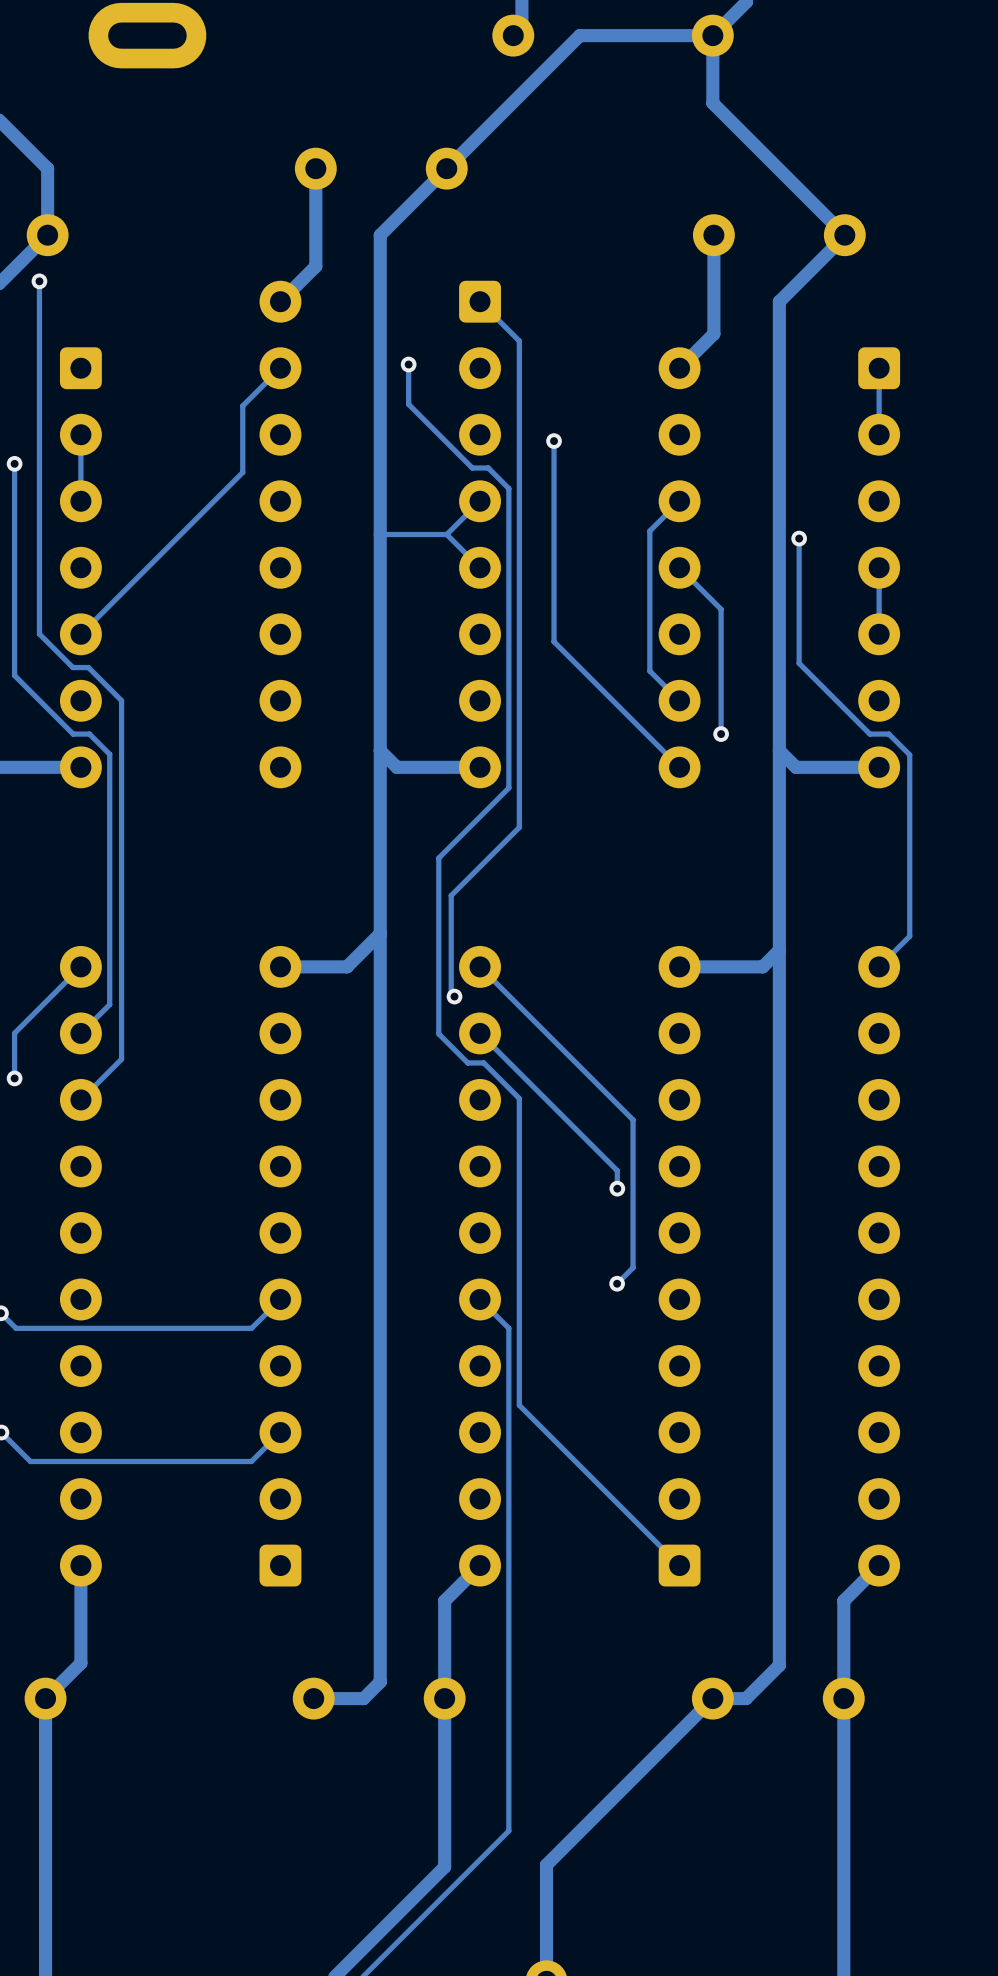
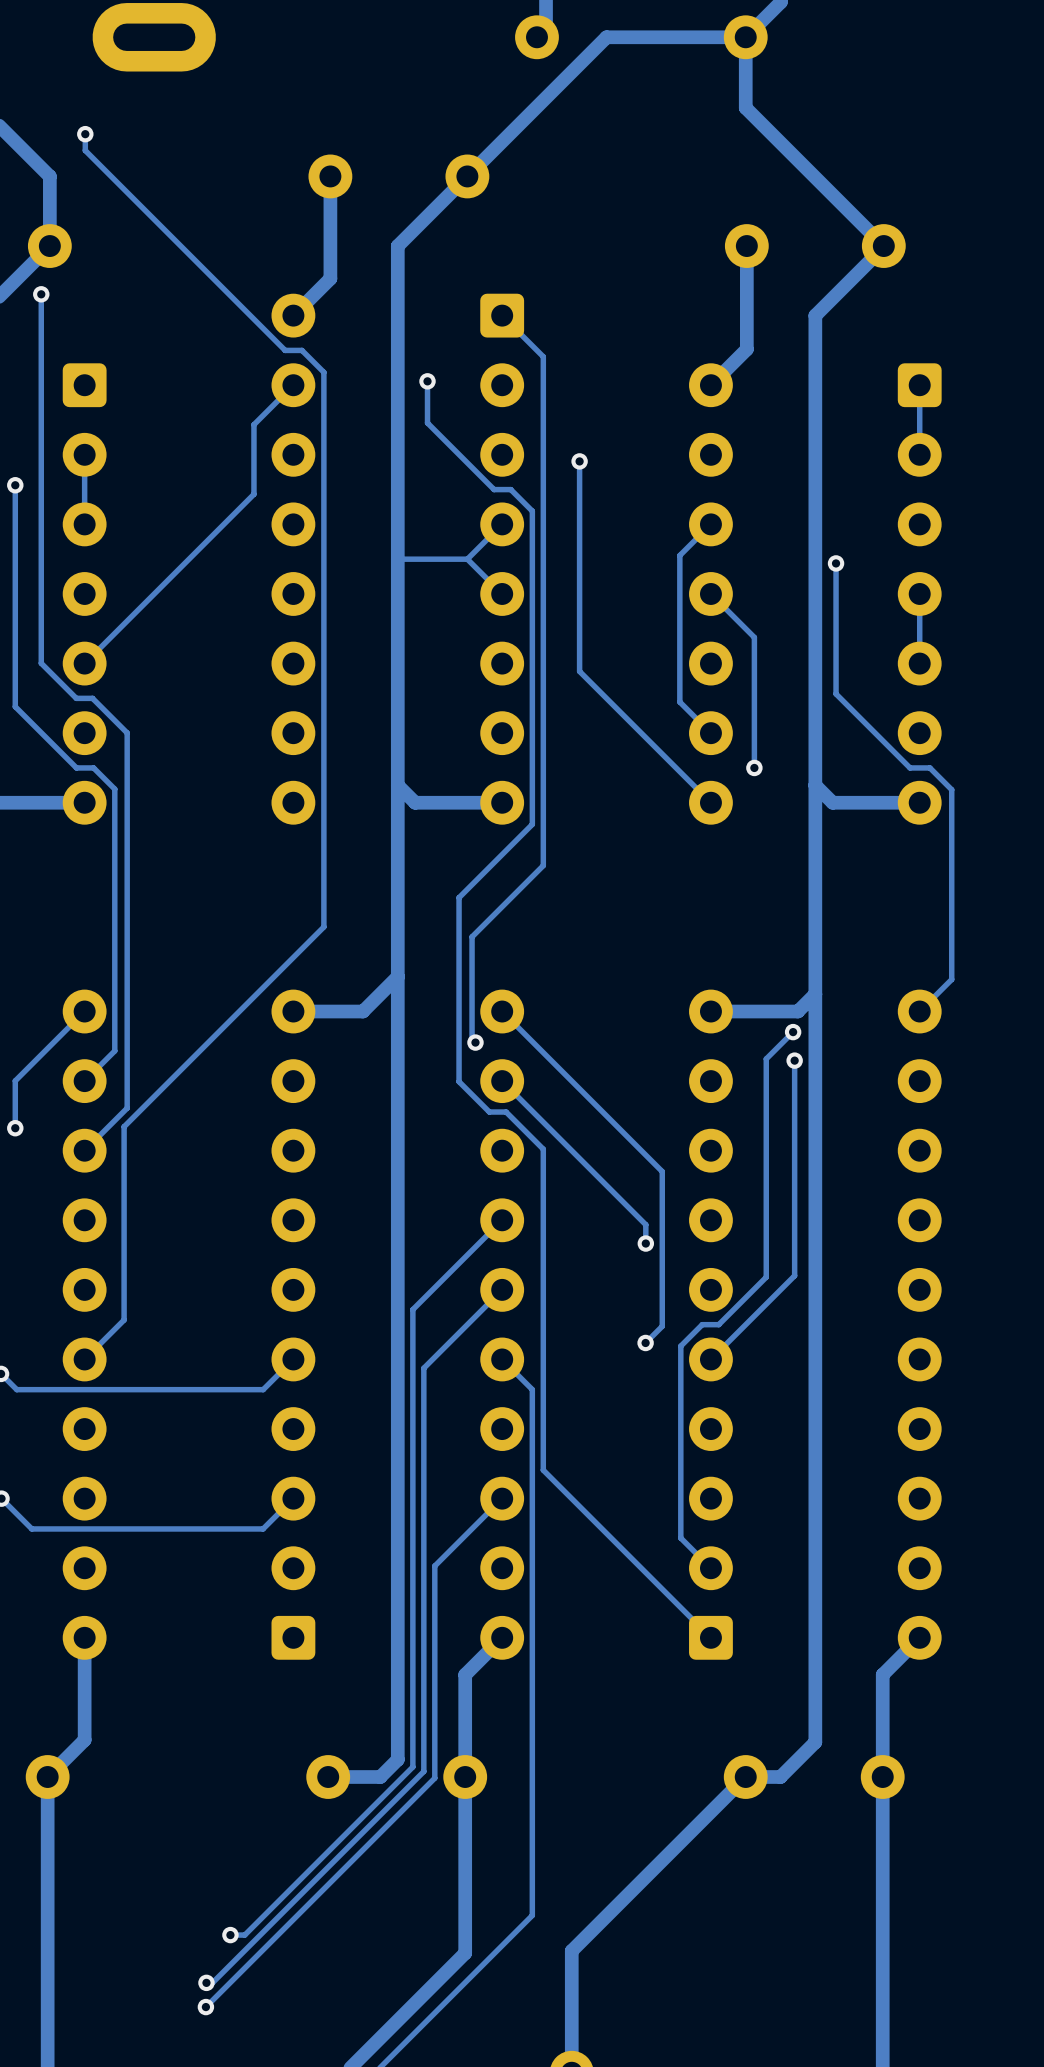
track: none -> (85, 134) (85, 150) (285, 350) (301, 350) (323, 372) (323, 926) (124, 1126) (124, 1320) (84, 1359)
via: none -> (85, 134)
track: none -> (793, 1032) (766, 1058) (766, 1277) (718, 1324) (702, 1324) (680, 1346) (680, 1538) (710, 1568)
via: none -> (793, 1032)
track: none -> (794, 1060) (794, 1275) (710, 1359)
via: none -> (794, 1060)
track: none -> (502, 1220) (412, 1309) (412, 1766) (244, 1935) (230, 1935)
track: none -> (502, 1289) (423, 1368) (423, 1771) (212, 1982) (206, 1982)
track: none -> (502, 1498) (434, 1566) (434, 1778) (205, 2007)
via: none -> (230, 1935)
via: none -> (206, 1982)
via: none -> (205, 2007)

